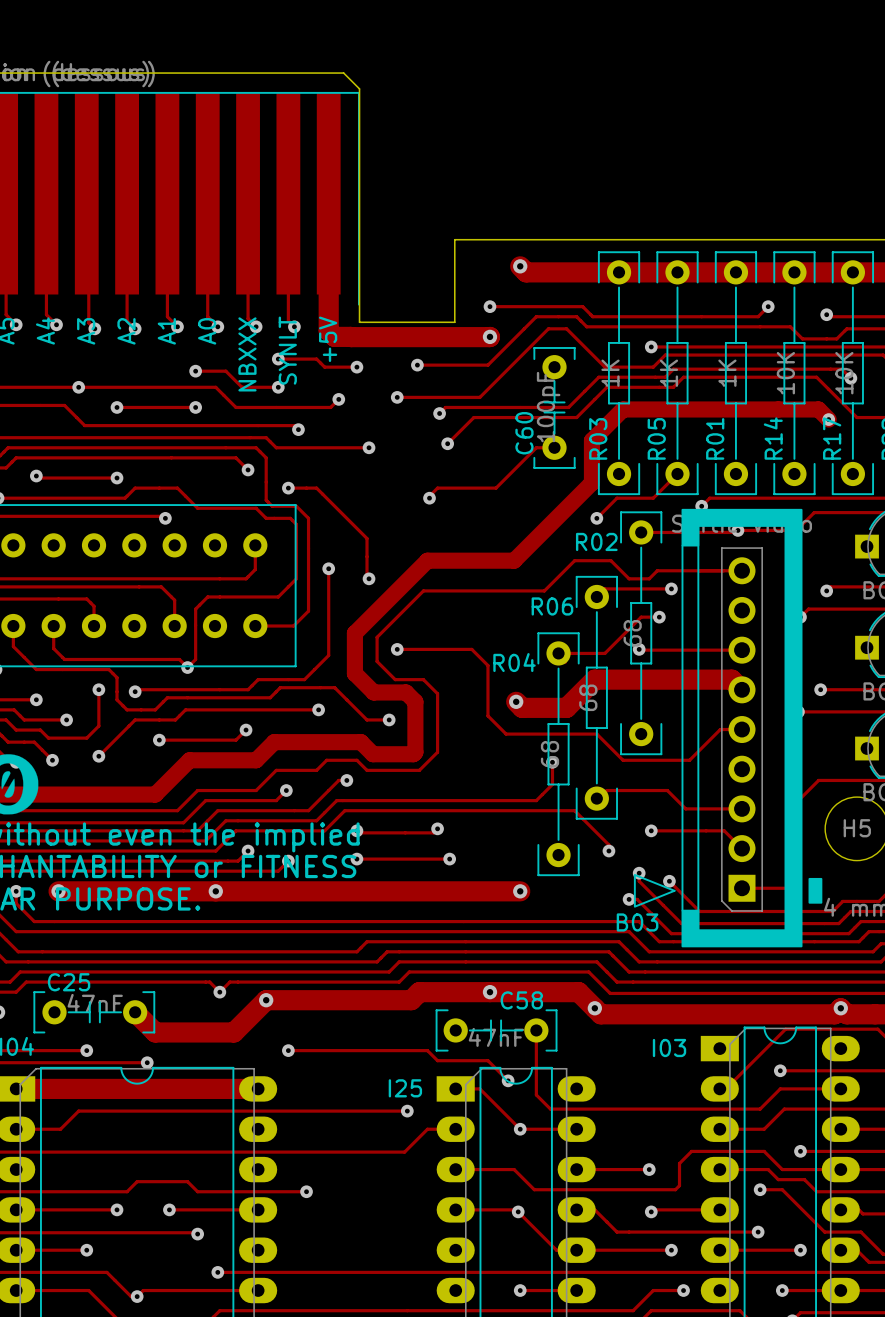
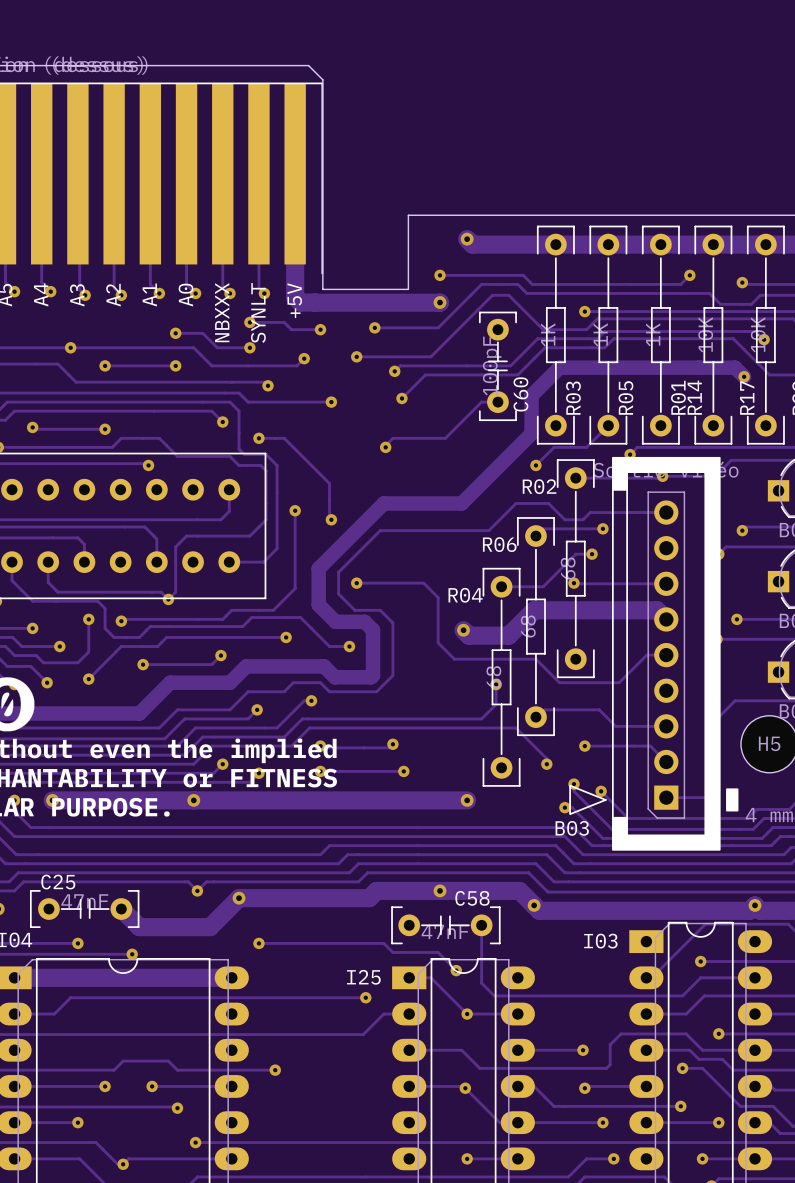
C60 name position: C60 (524, 433) -> C60 (520, 394)
R03 name position: R03 (598, 438) -> R03 (573, 398)
R05 name position: R05 (656, 438) -> R05 (625, 397)
R01 name position: R01 (715, 438) -> R01 (678, 397)

